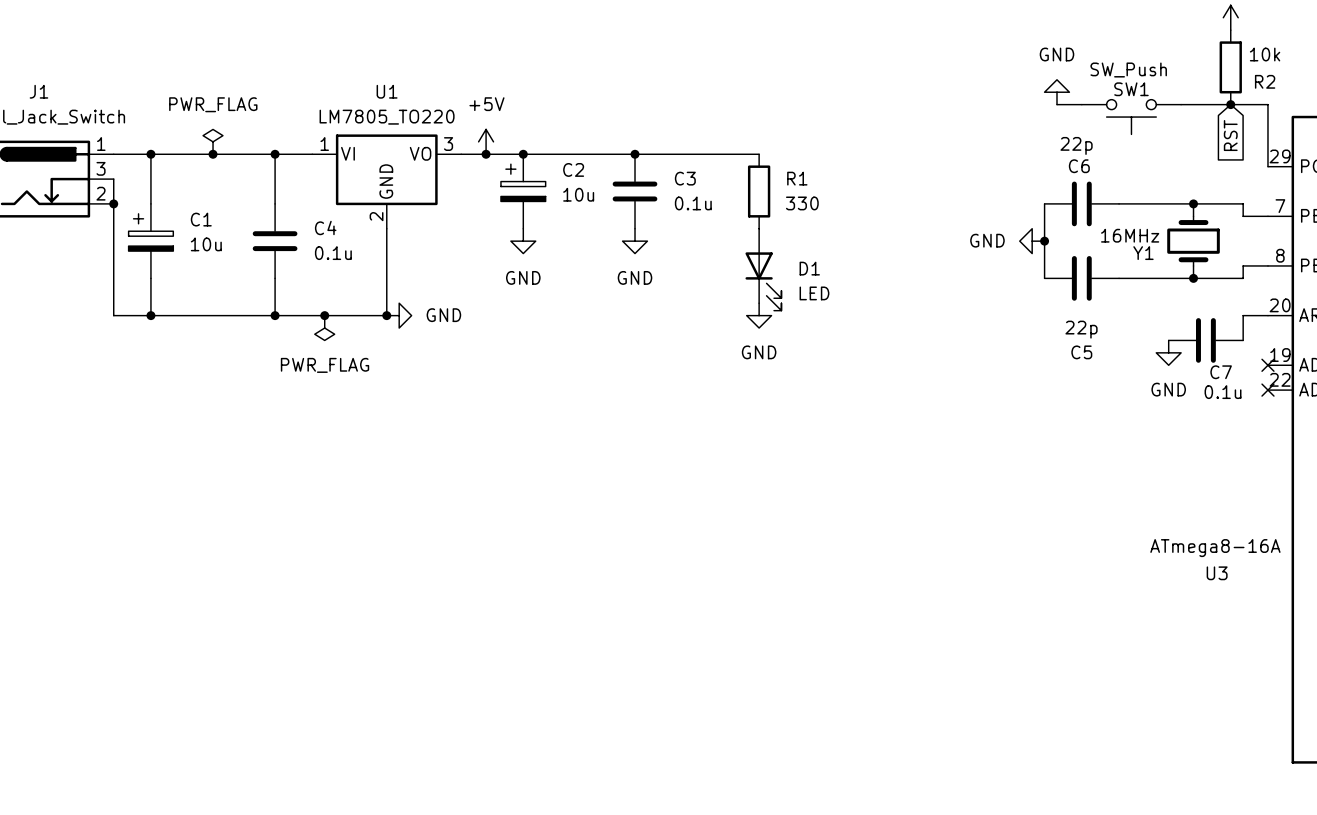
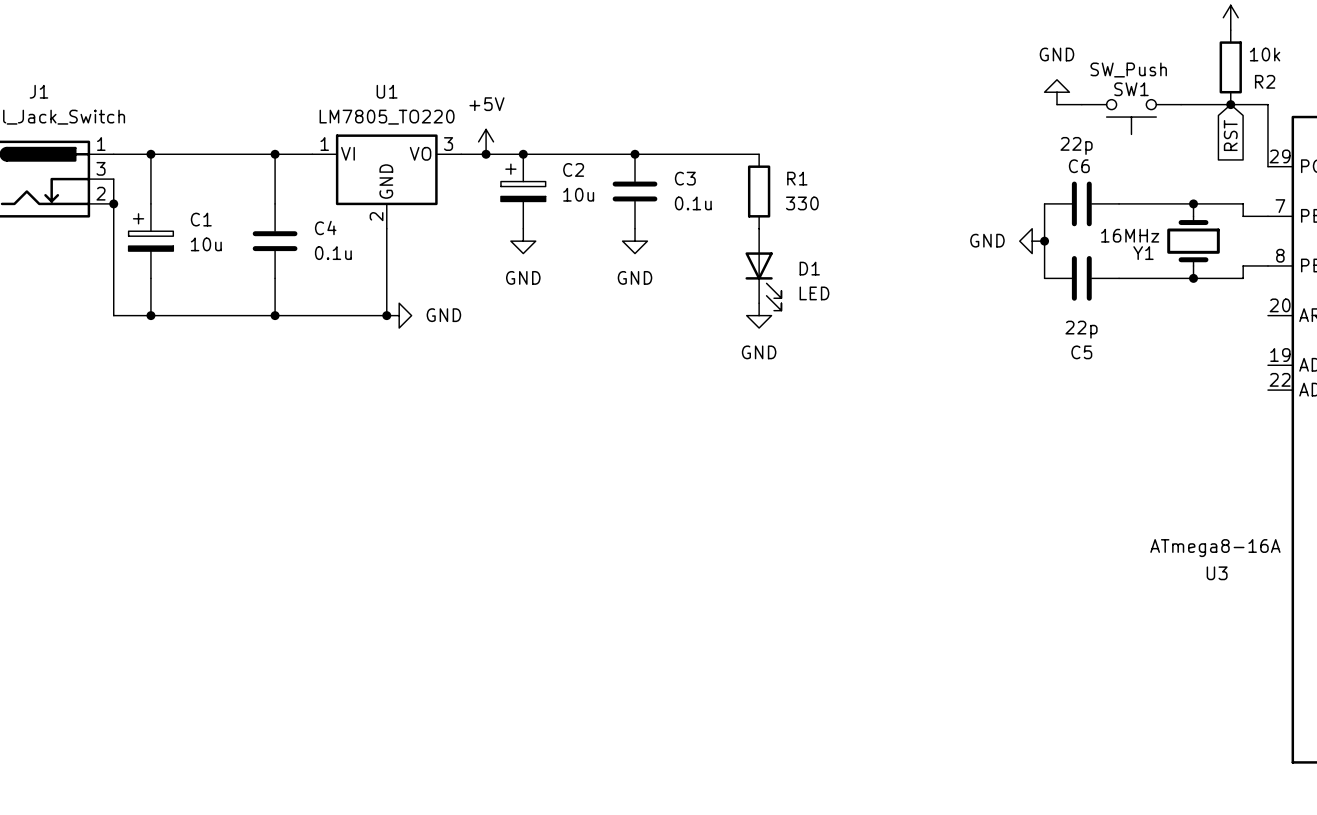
power symbol: PWR_FLAG (213, 141) -> none
junction: (213, 154) -> none
junction: (324, 315) -> none
wire: (1267, 315) (1243, 315) (1243, 340) -> none
power symbol: PWR_FLAG (324, 328) -> none
C7: 0.1u (1205, 340) -> none
power symbol: GND (1168, 352) -> none
no-connect mark: (1267, 365) -> none
no-connect mark: (1267, 390) -> none

